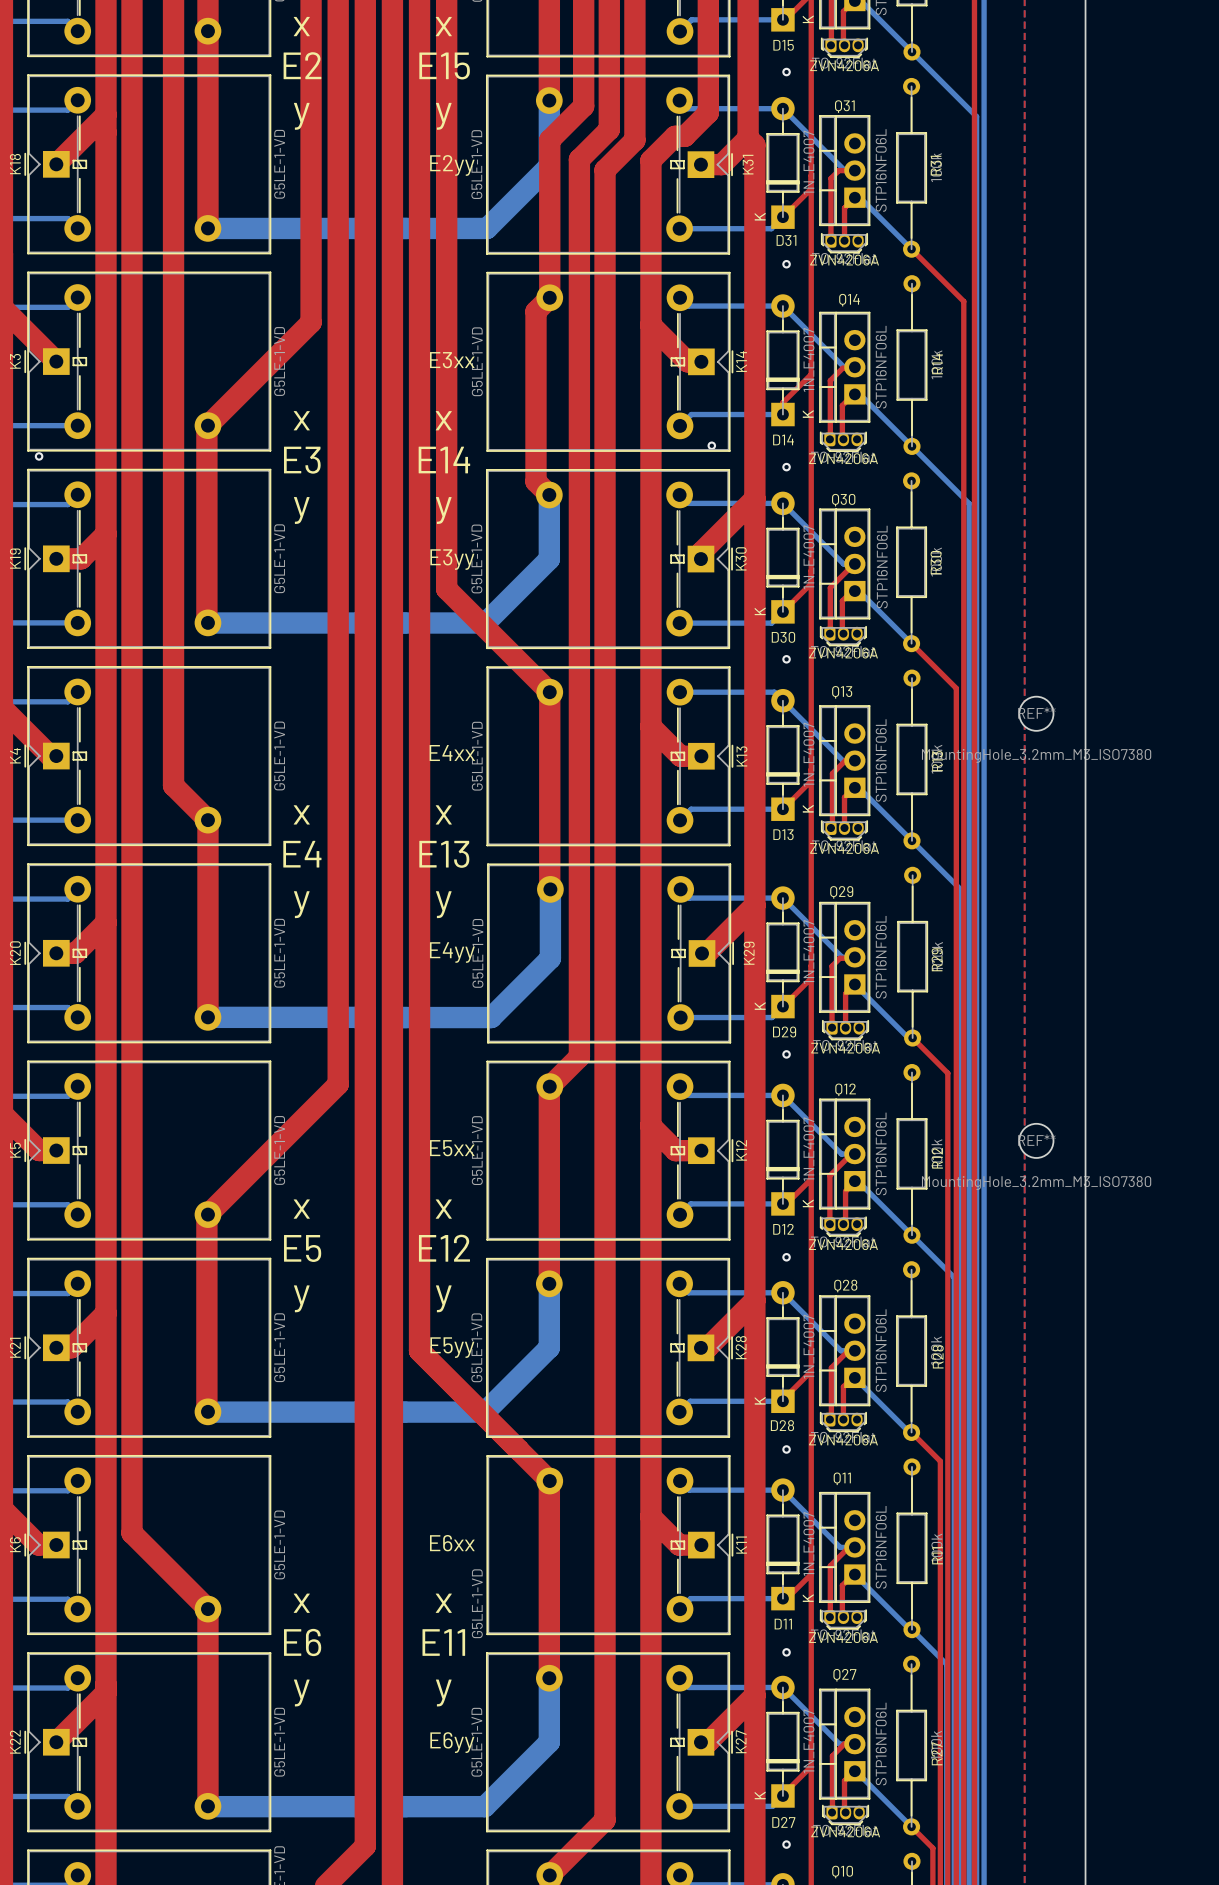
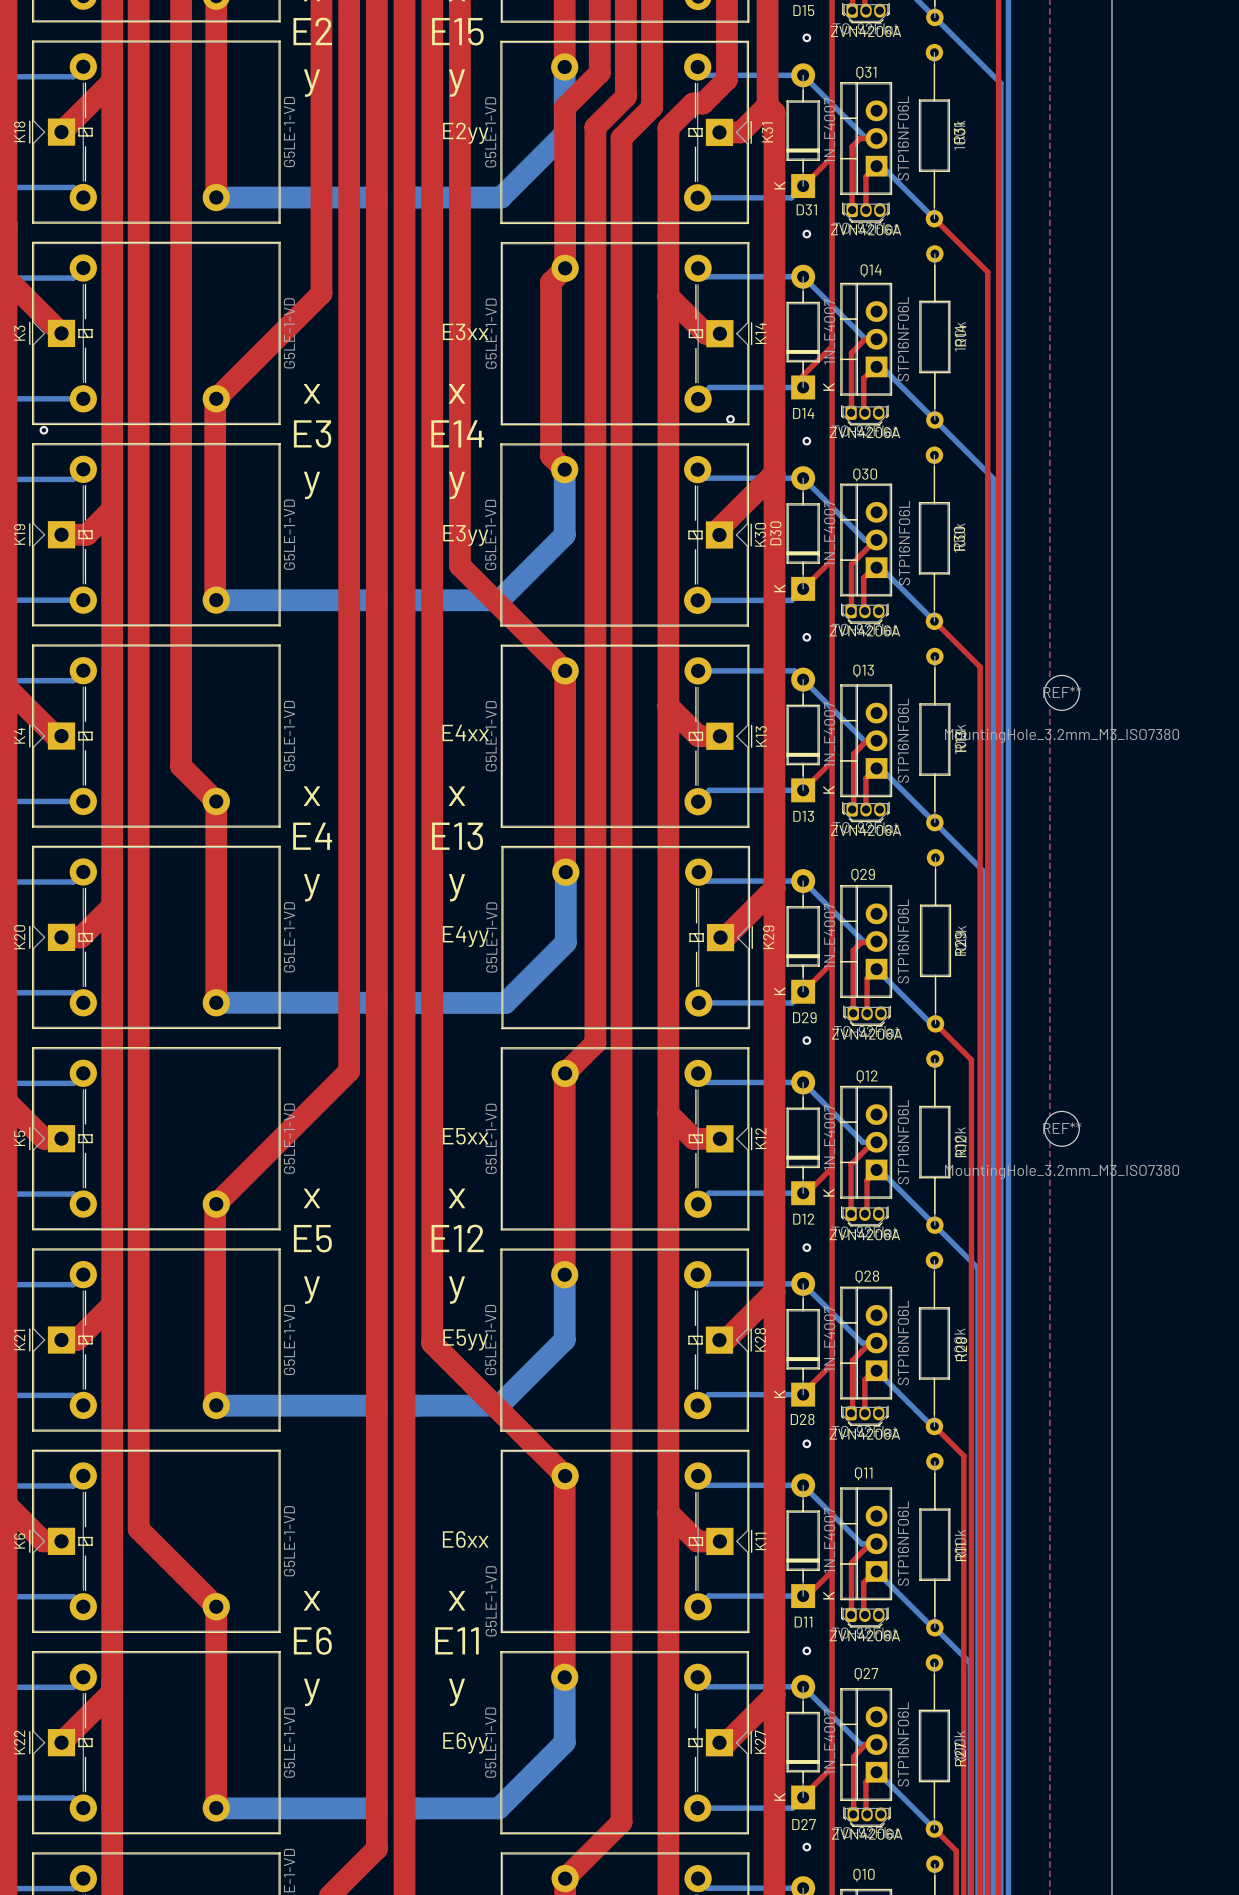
D30 name rotation: 0° (783, 637) -> 90° counterclockwise (775, 533)
D30 name position: D30 (783, 637) -> D30 (775, 533)

